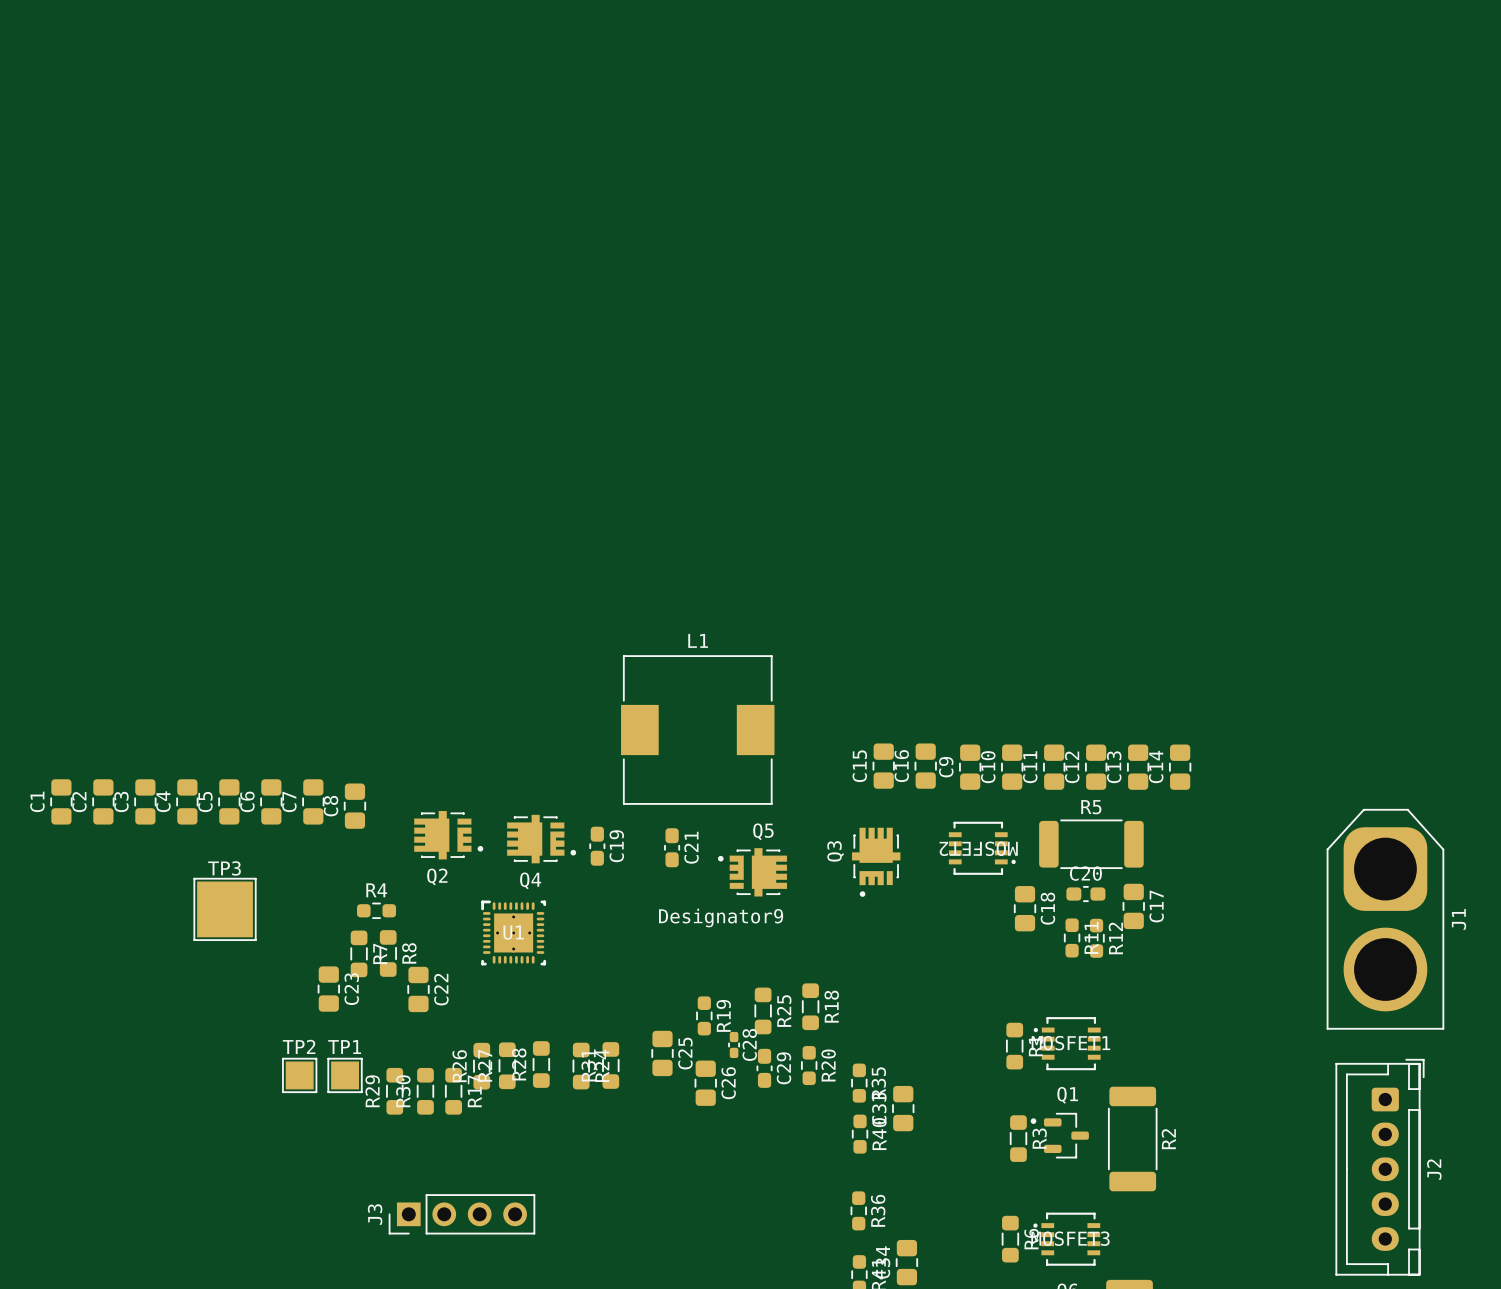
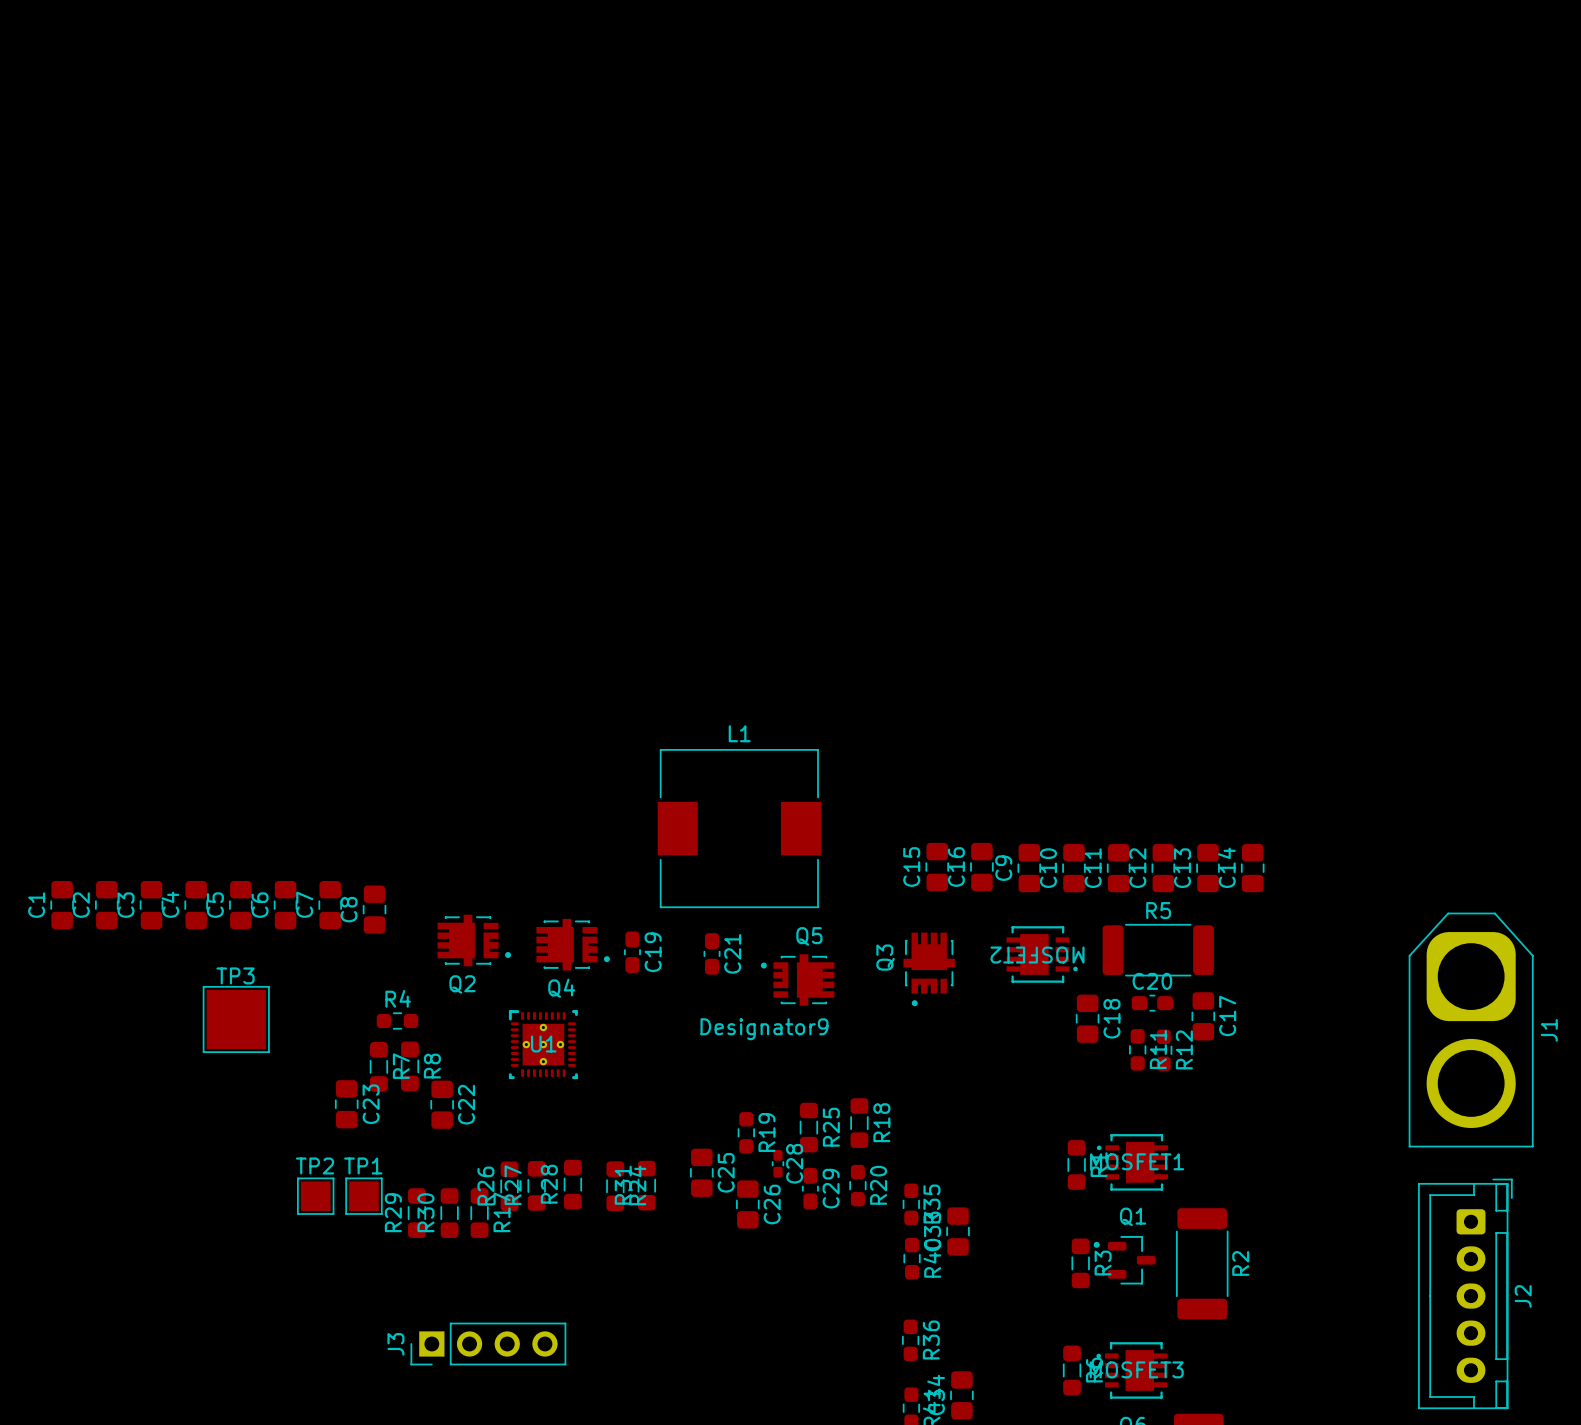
MOSFET2 footprint: [948, 821, 1016, 875] -> [1006, 926, 1078, 983]
MOSFET1 footprint: [1033, 1017, 1101, 1071] -> [1096, 1134, 1169, 1191]
MOSFET3 footprint: [1033, 1212, 1101, 1266] -> [1096, 1342, 1168, 1399]

